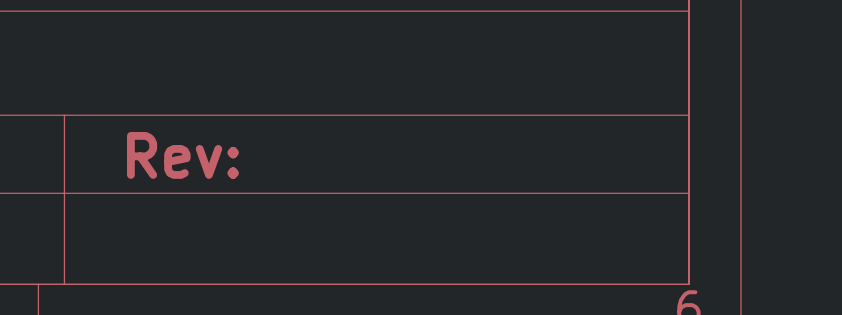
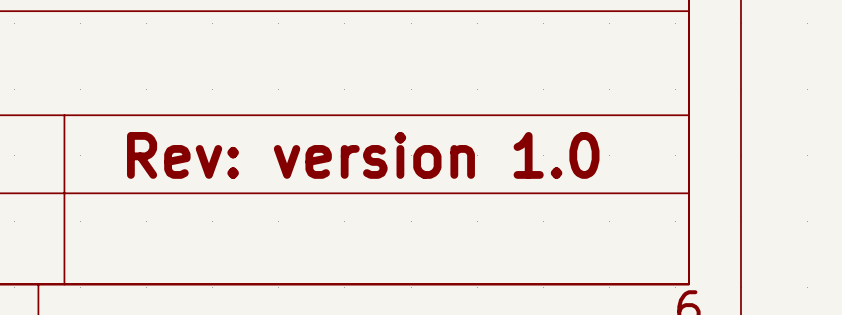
title block: Rev: (182, 155) -> Rev: version 1.0 (363, 155)

